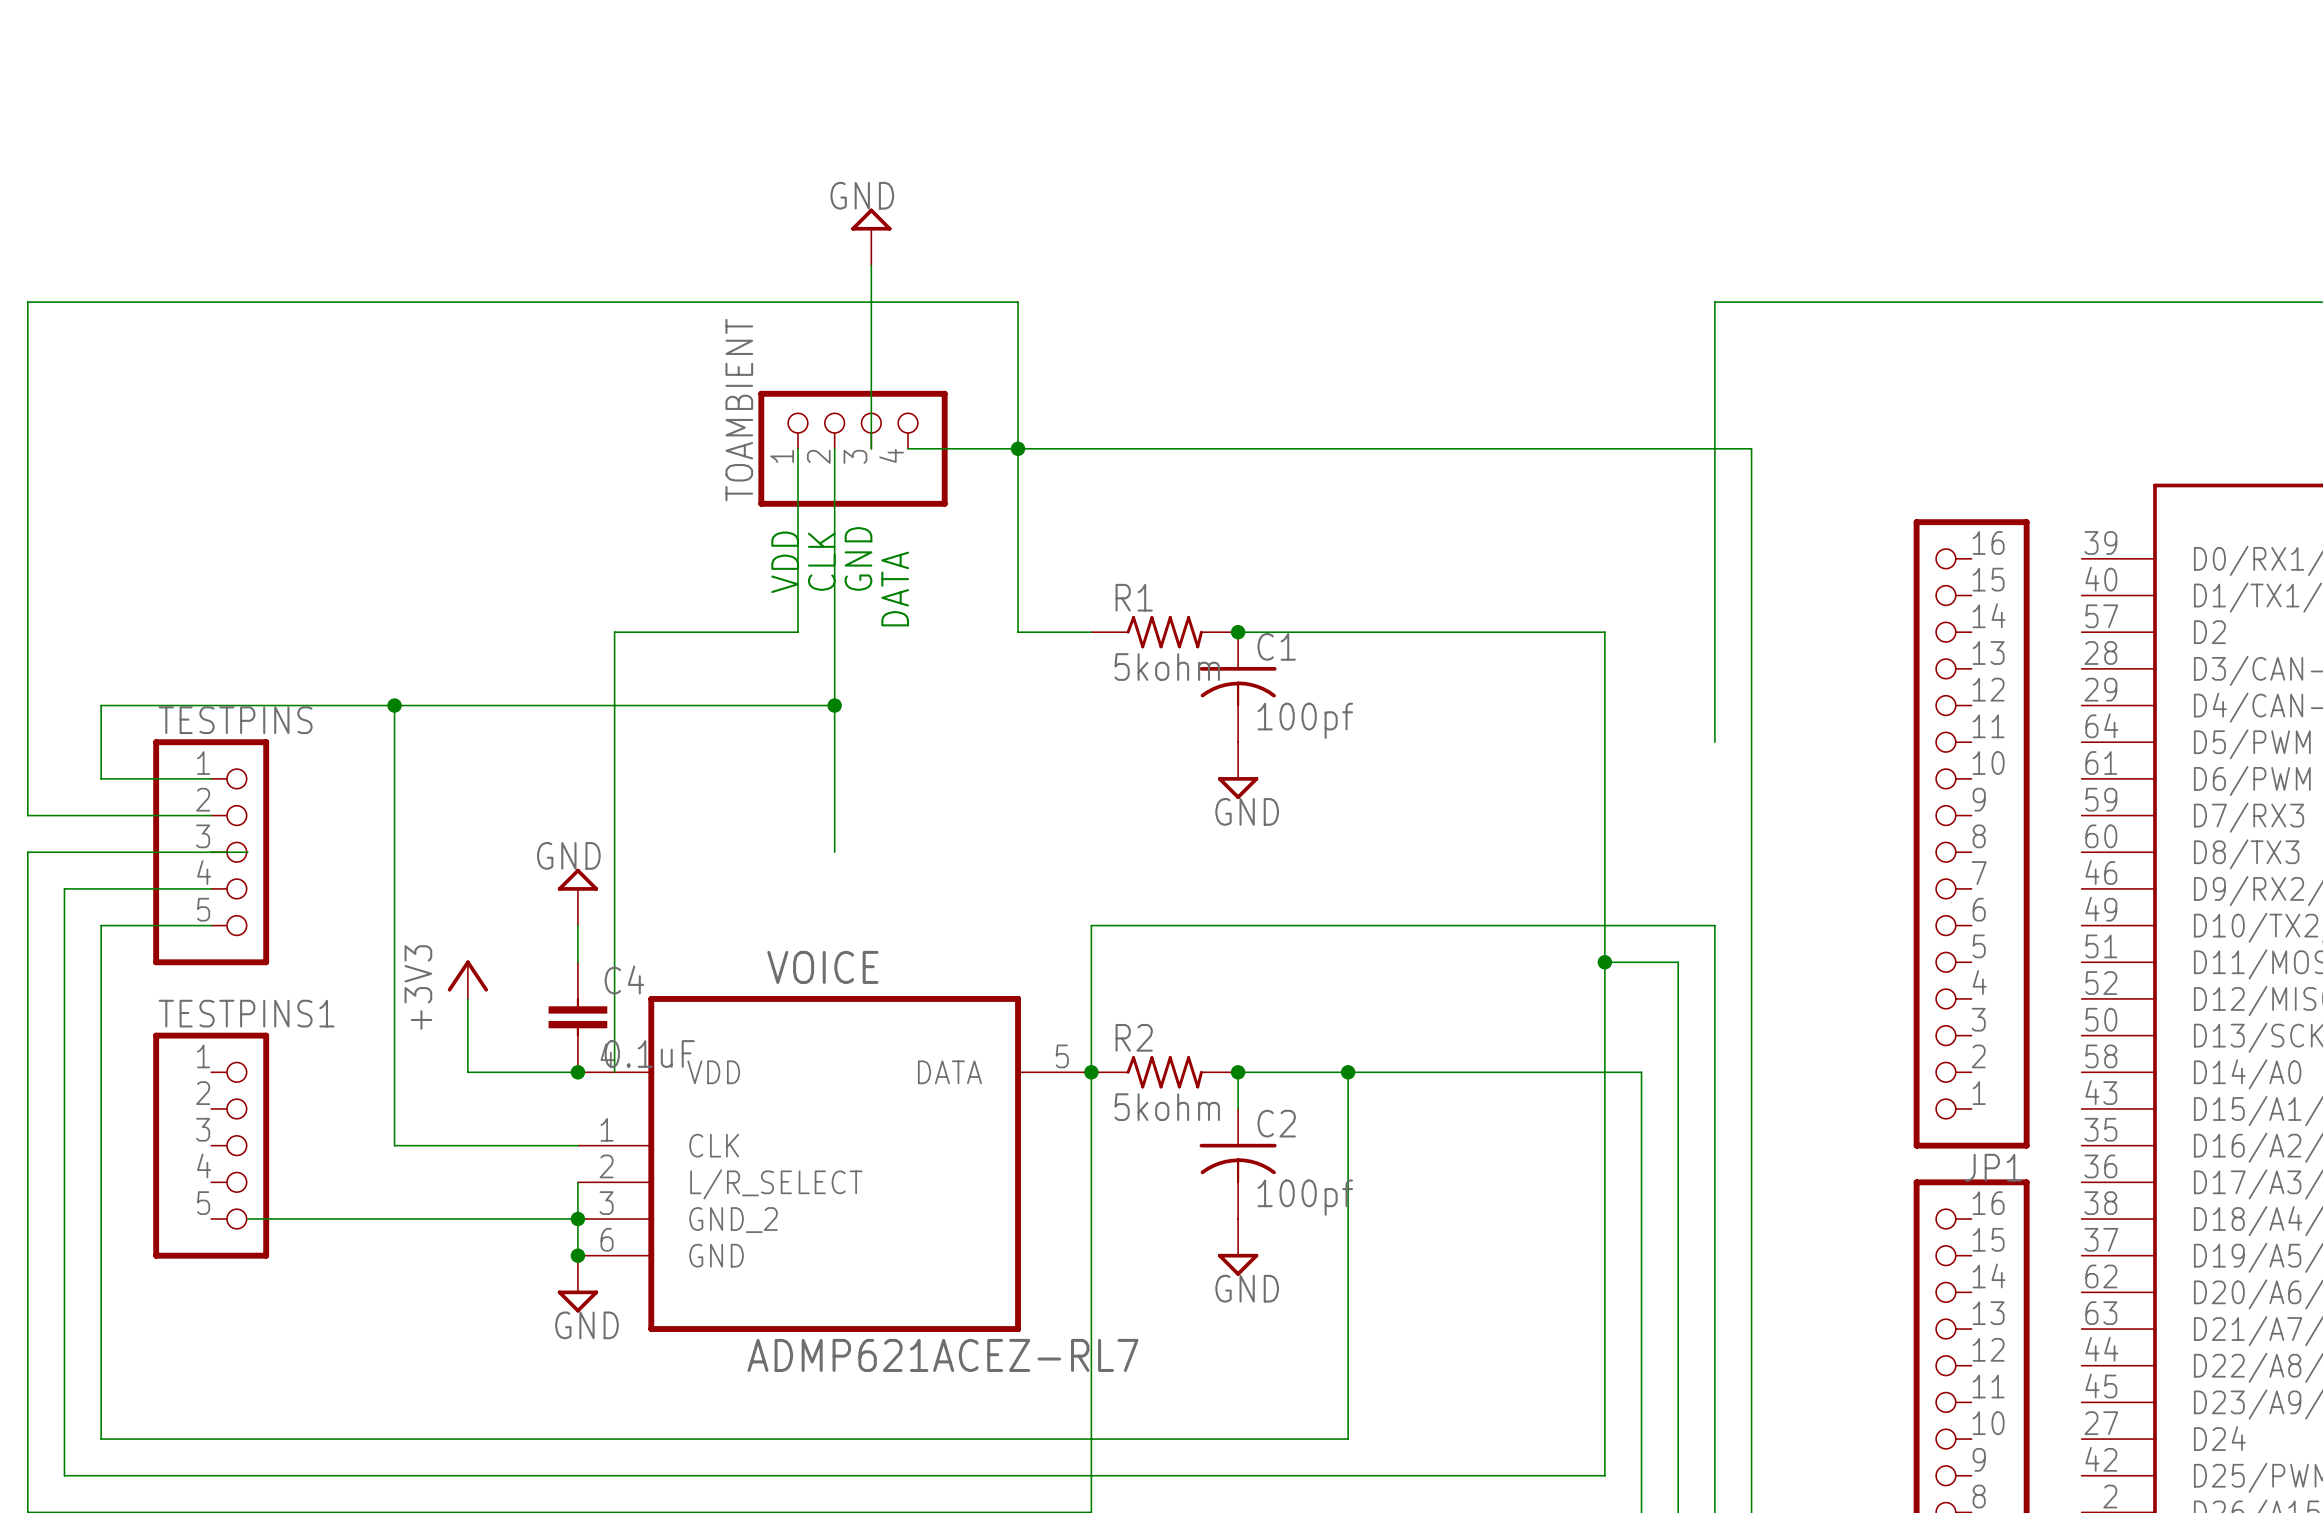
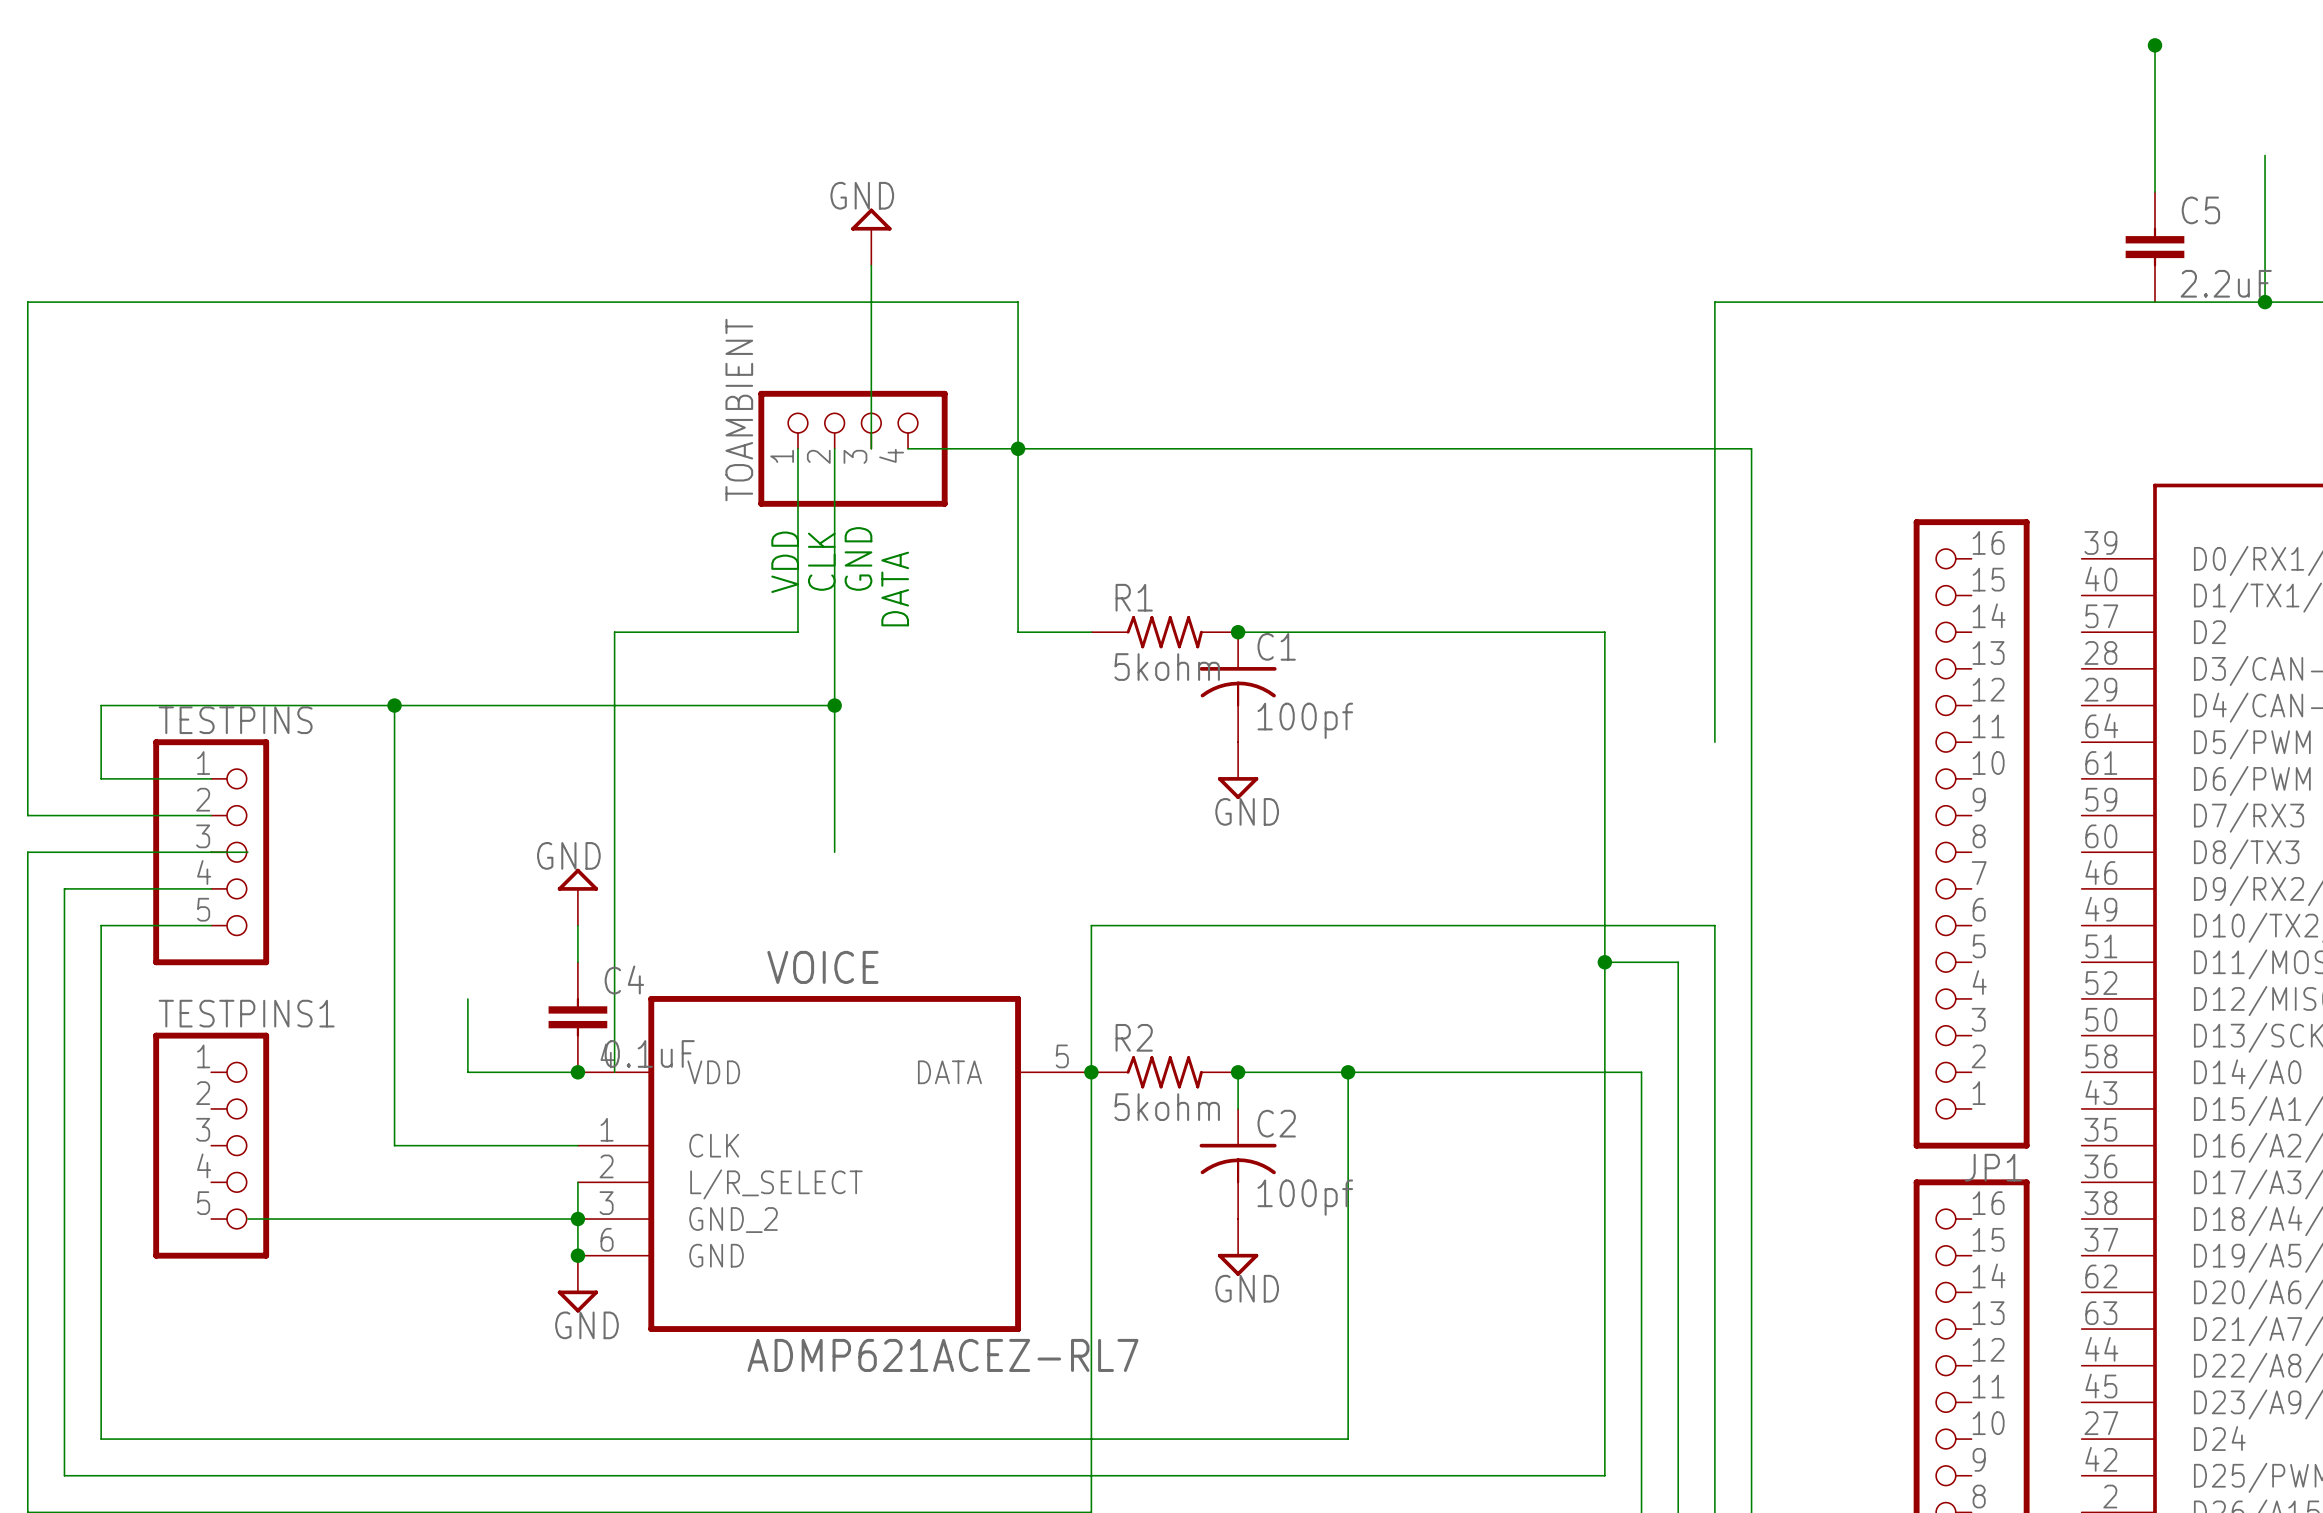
wire: none -> (2155, 45) (2155, 192)
junction: none -> (2155, 45)
wire: none -> (2265, 155) (2265, 302)
C5: none -> 2.2uF (2155, 247)
junction: none -> (2265, 302)
power symbol: +3V3 (467, 979) -> none

